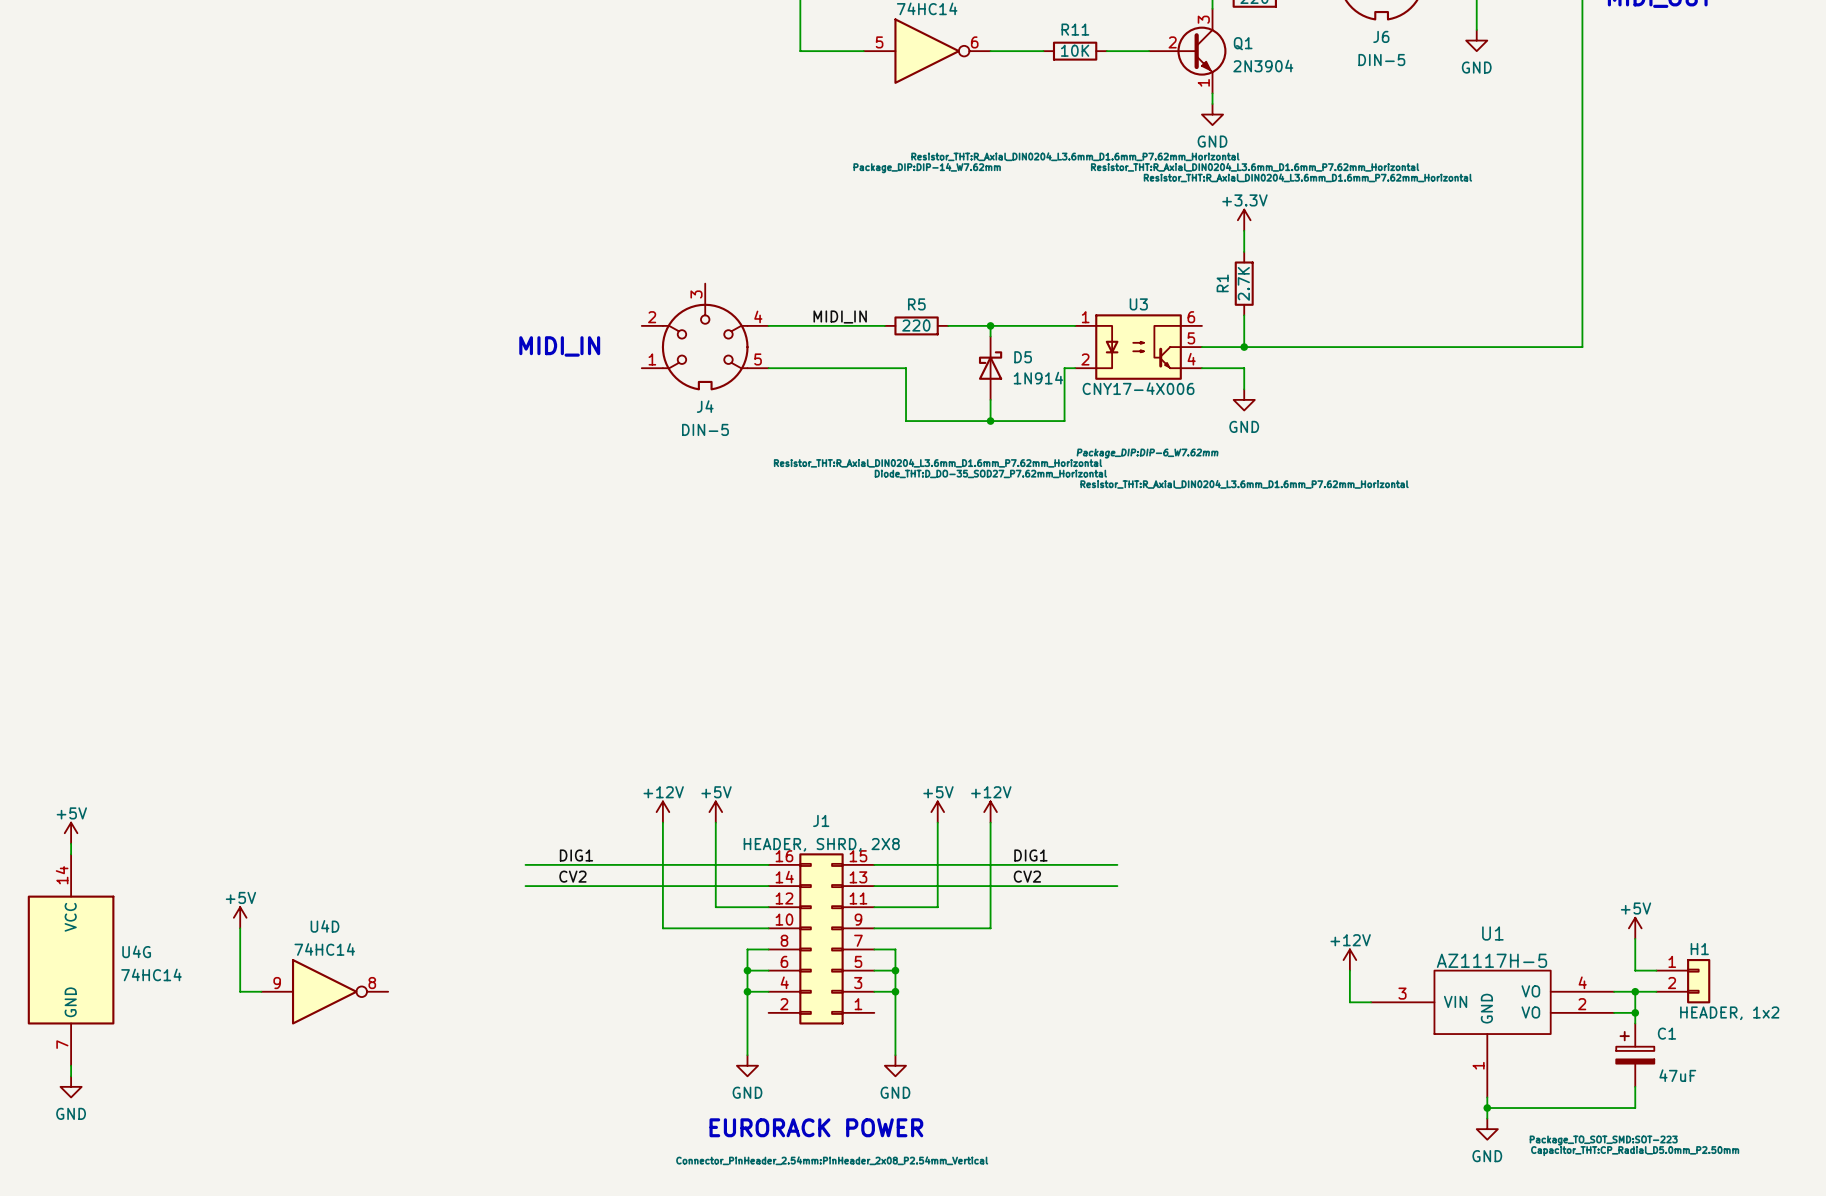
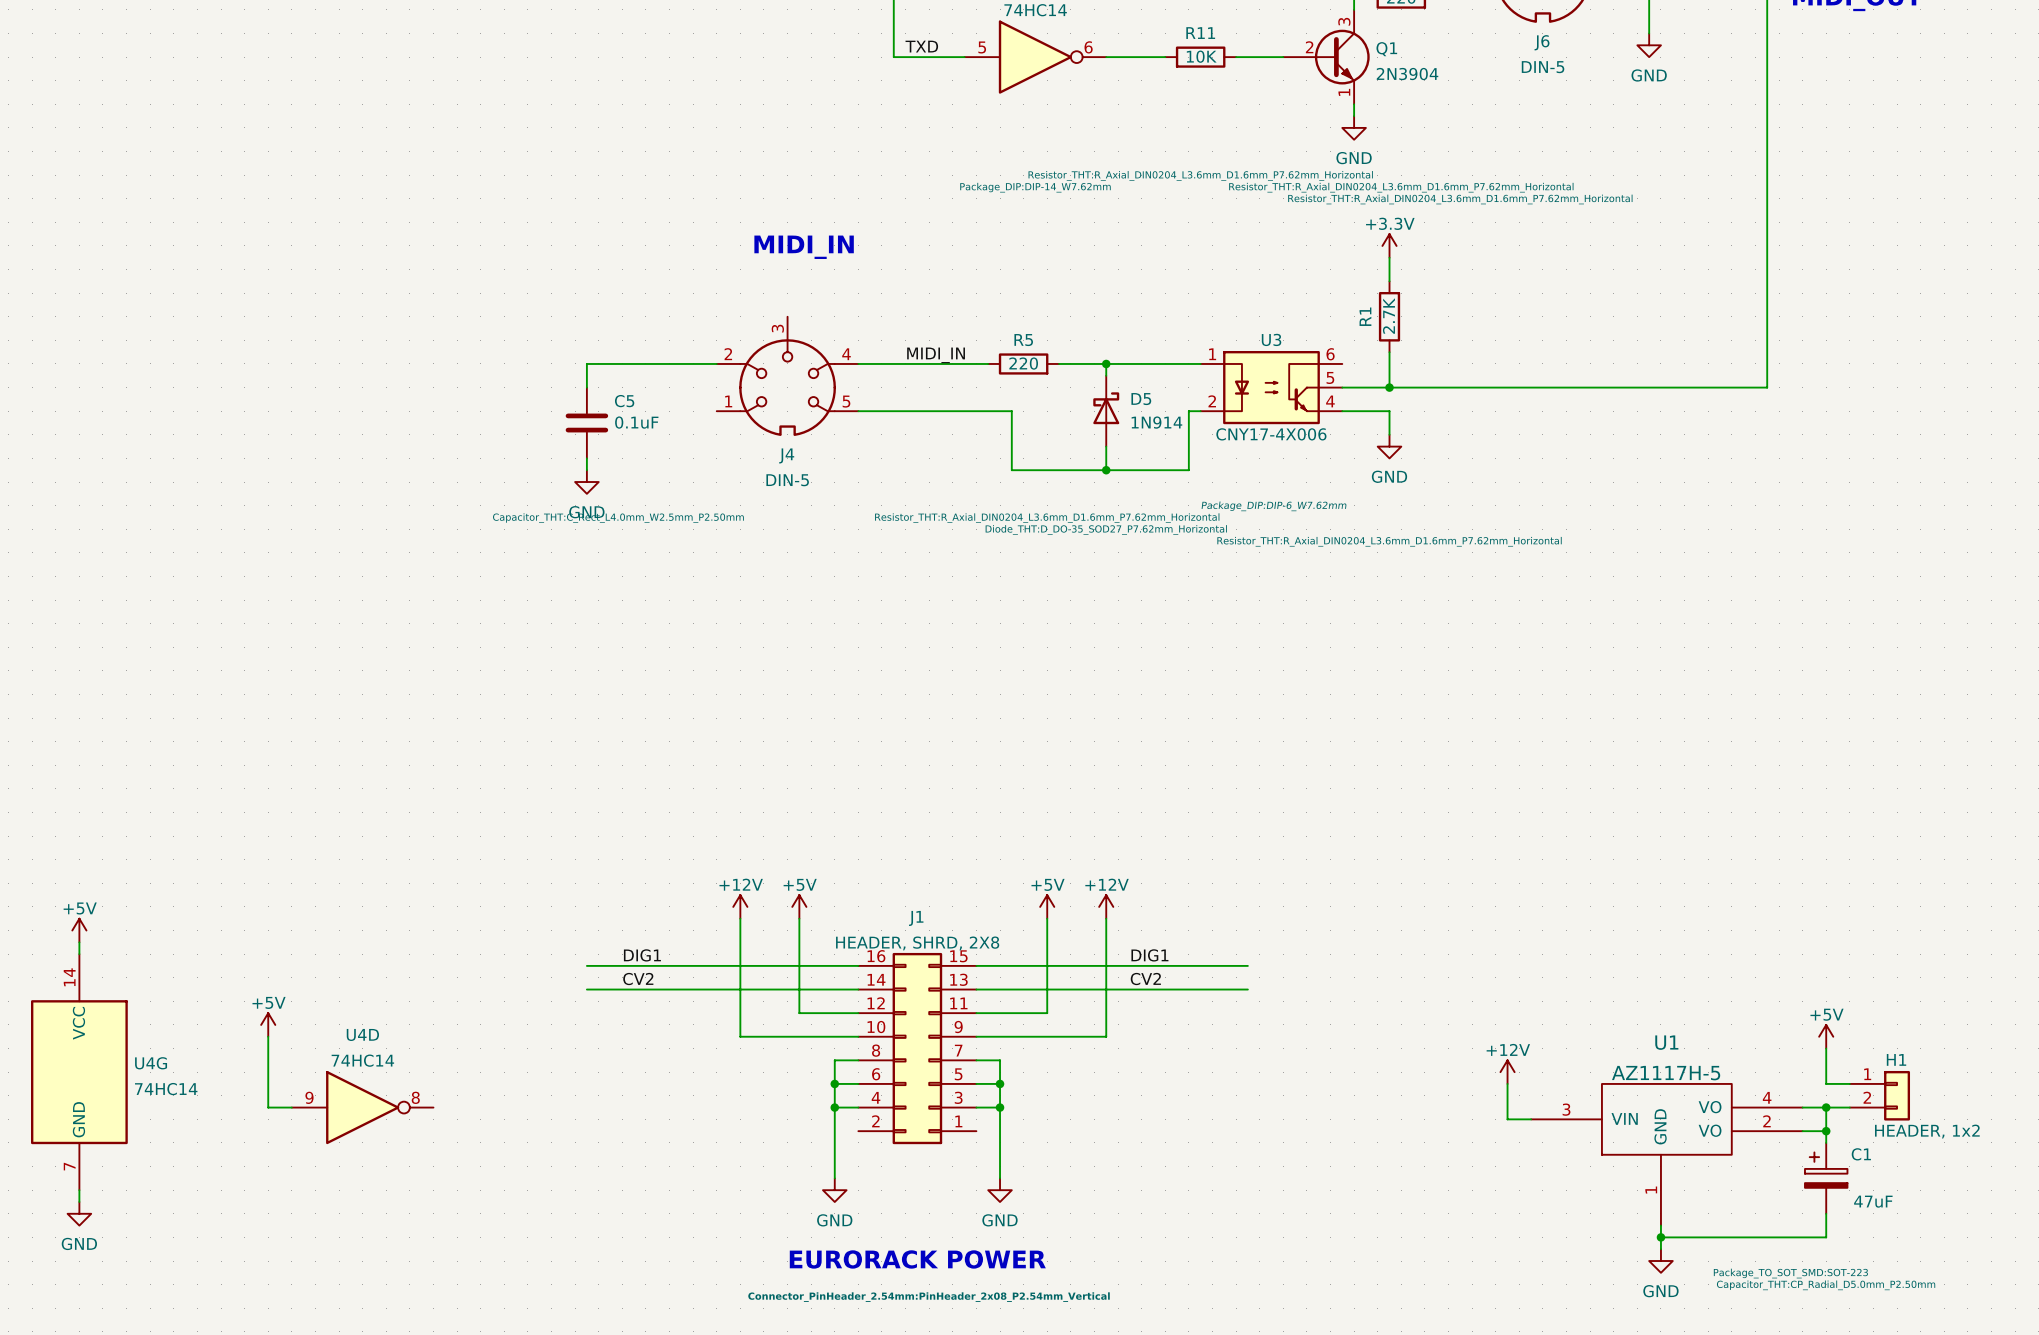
label: none -> TXD (921, 46)
wire: none -> (716, 363) (586, 363) (586, 387)
text position: MIDI_IN (559, 346) -> MIDI_IN (804, 247)
C5: none -> 0.1uF (586, 423)
wire: none -> (586, 458) (586, 470)
power symbol: none -> GND (586, 482)

